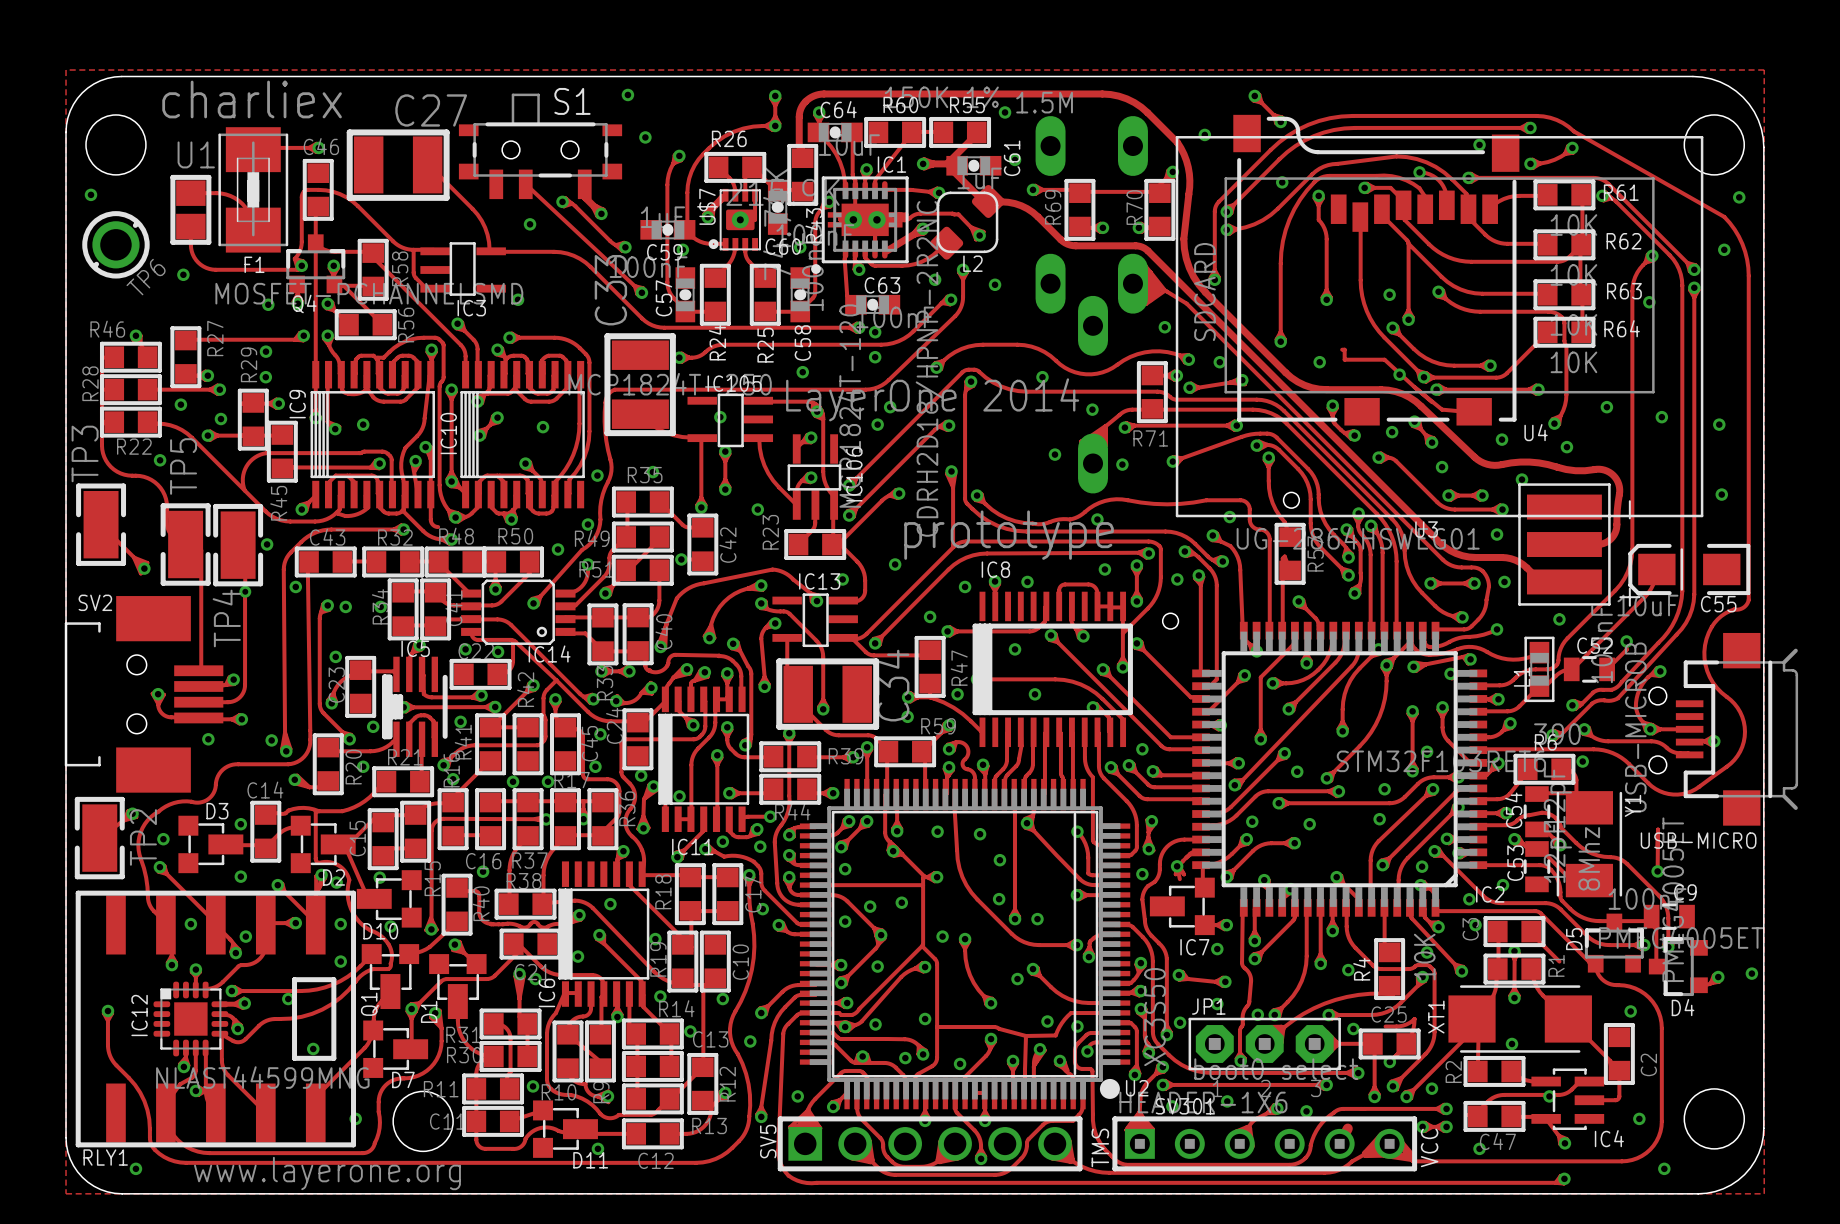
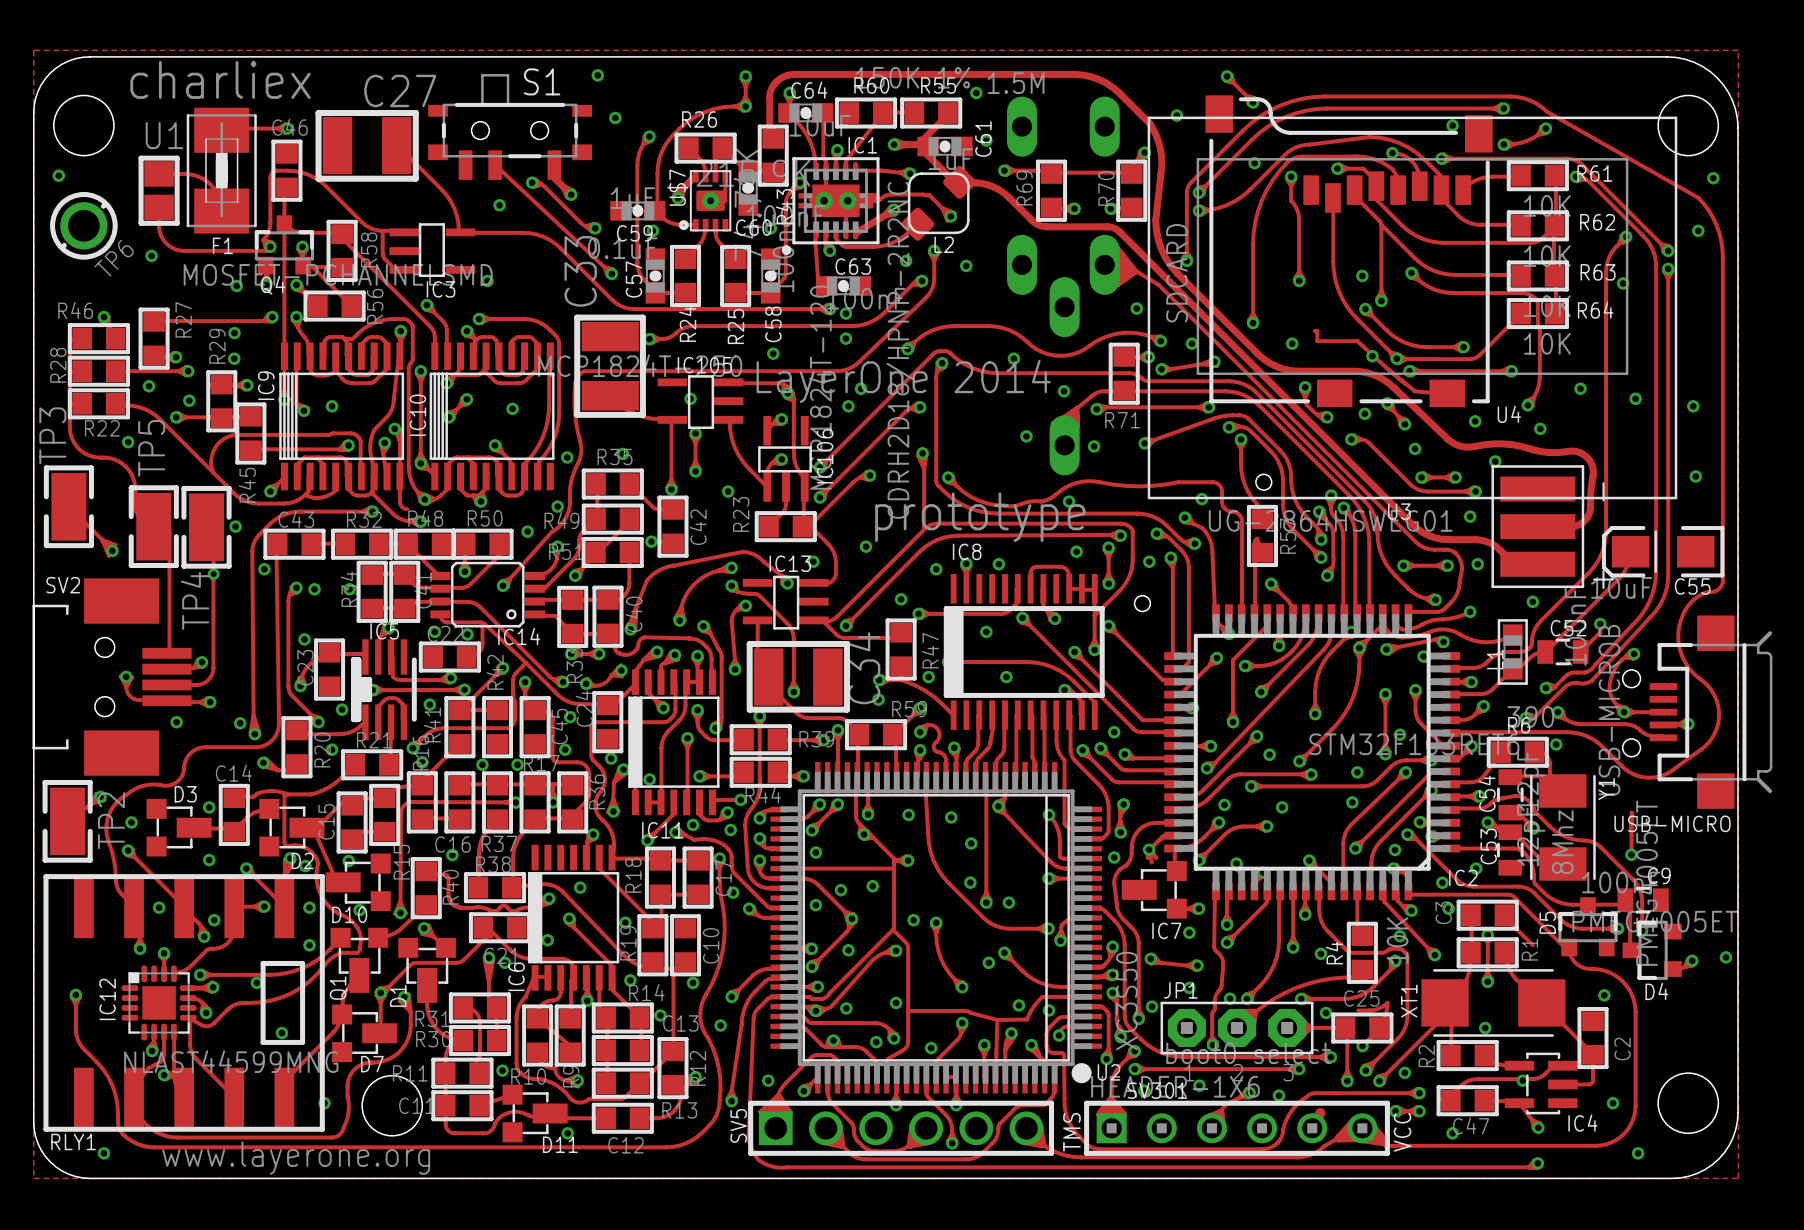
C57 value: 100nF (648, 267) -> 0.1uF (622, 248)

